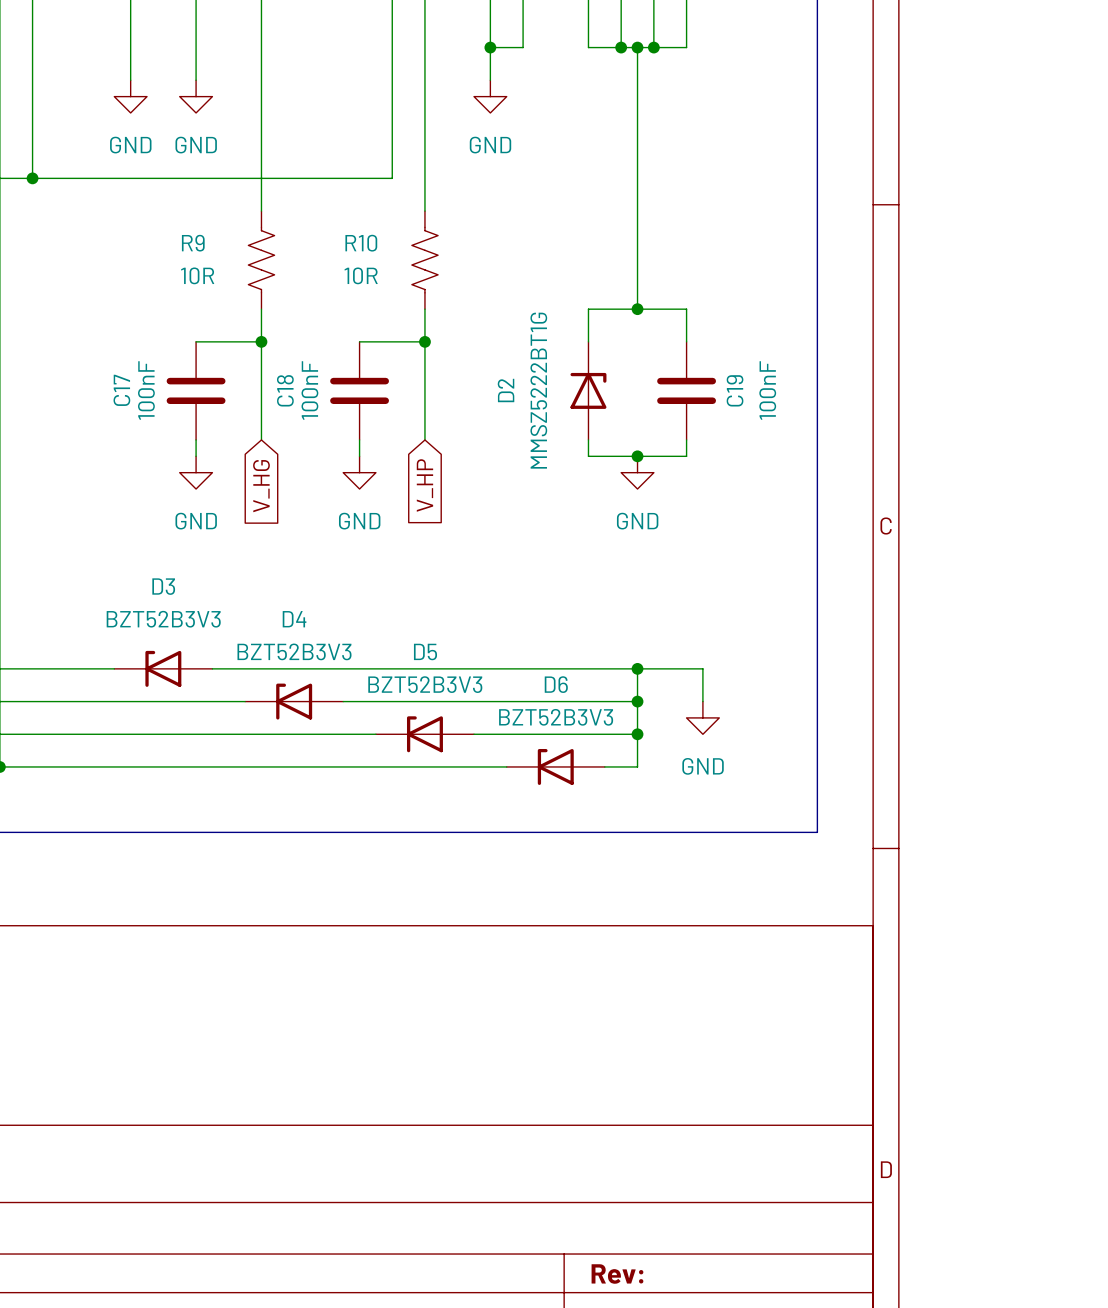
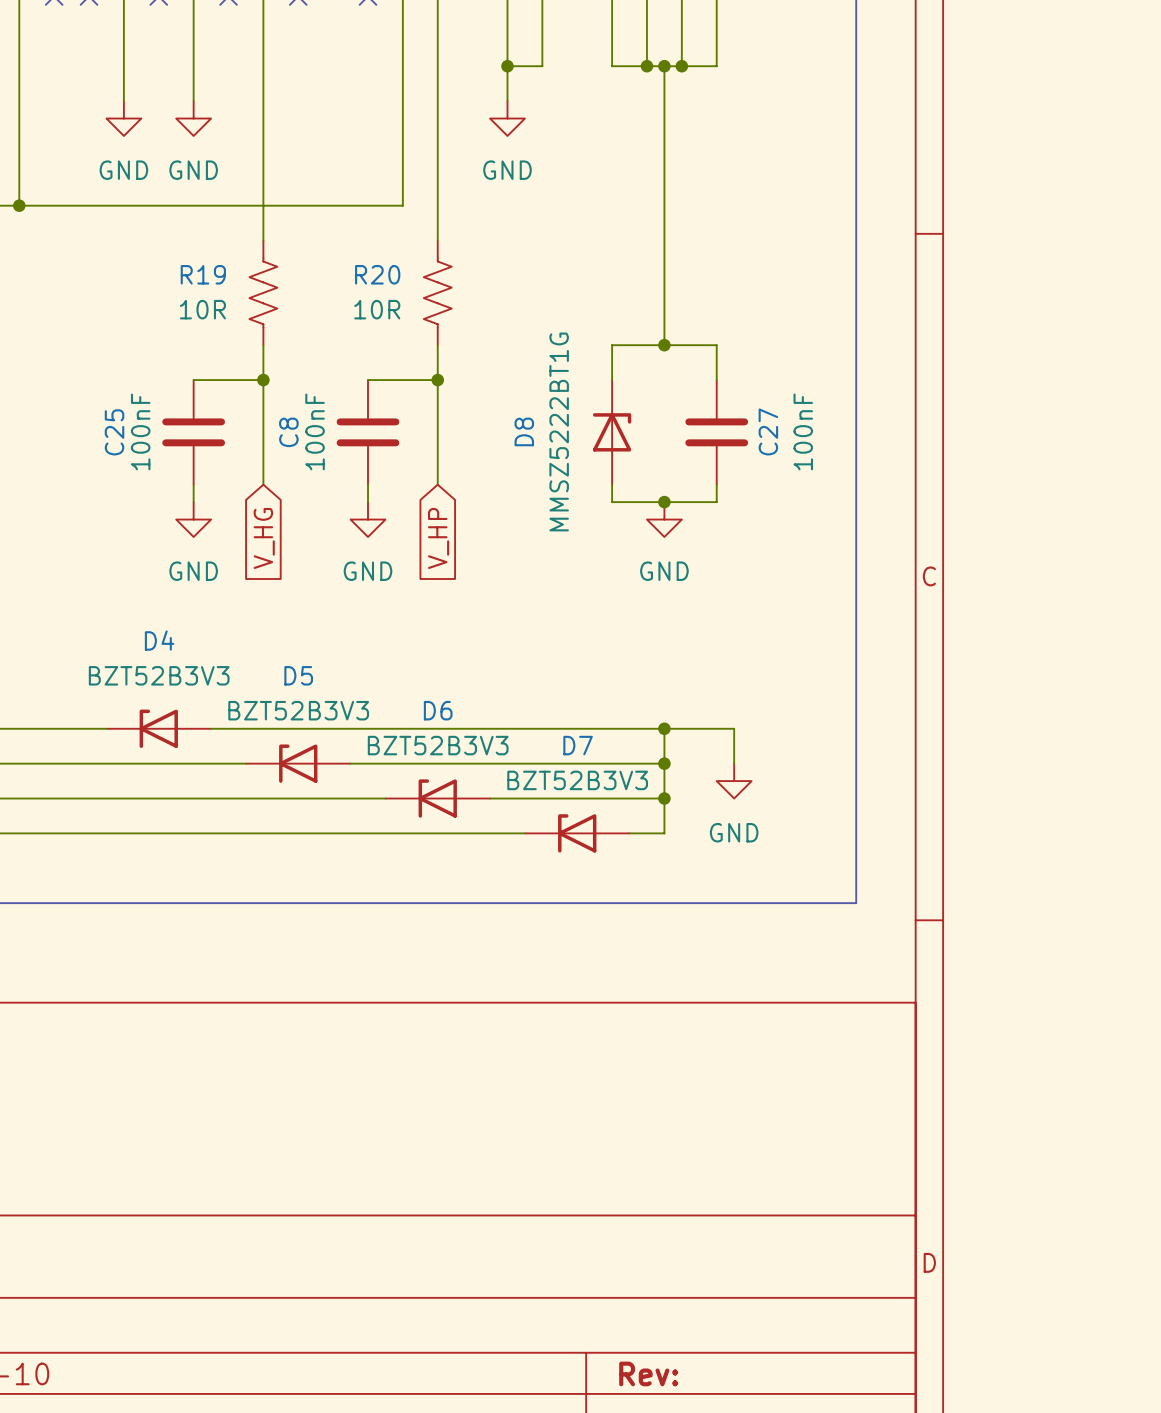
R9 name: R9 (193, 243) -> R19 (203, 274)
R10 name: R10 (361, 243) -> R20 (377, 274)
C17 name: C17 (121, 390) -> C25 (114, 432)
C18 name: C18 (285, 390) -> C8 (288, 432)
D2 name: D2 (506, 390) -> D8 (524, 431)
C19 name: C19 (735, 390) -> C27 (768, 431)
D3 name: D3 (163, 586) -> D4 (159, 640)
D4 name: D4 (294, 619) -> D5 (298, 675)
D5 name: D5 (425, 652) -> D6 (438, 710)
D6 name: D6 (556, 684) -> D7 (578, 745)

